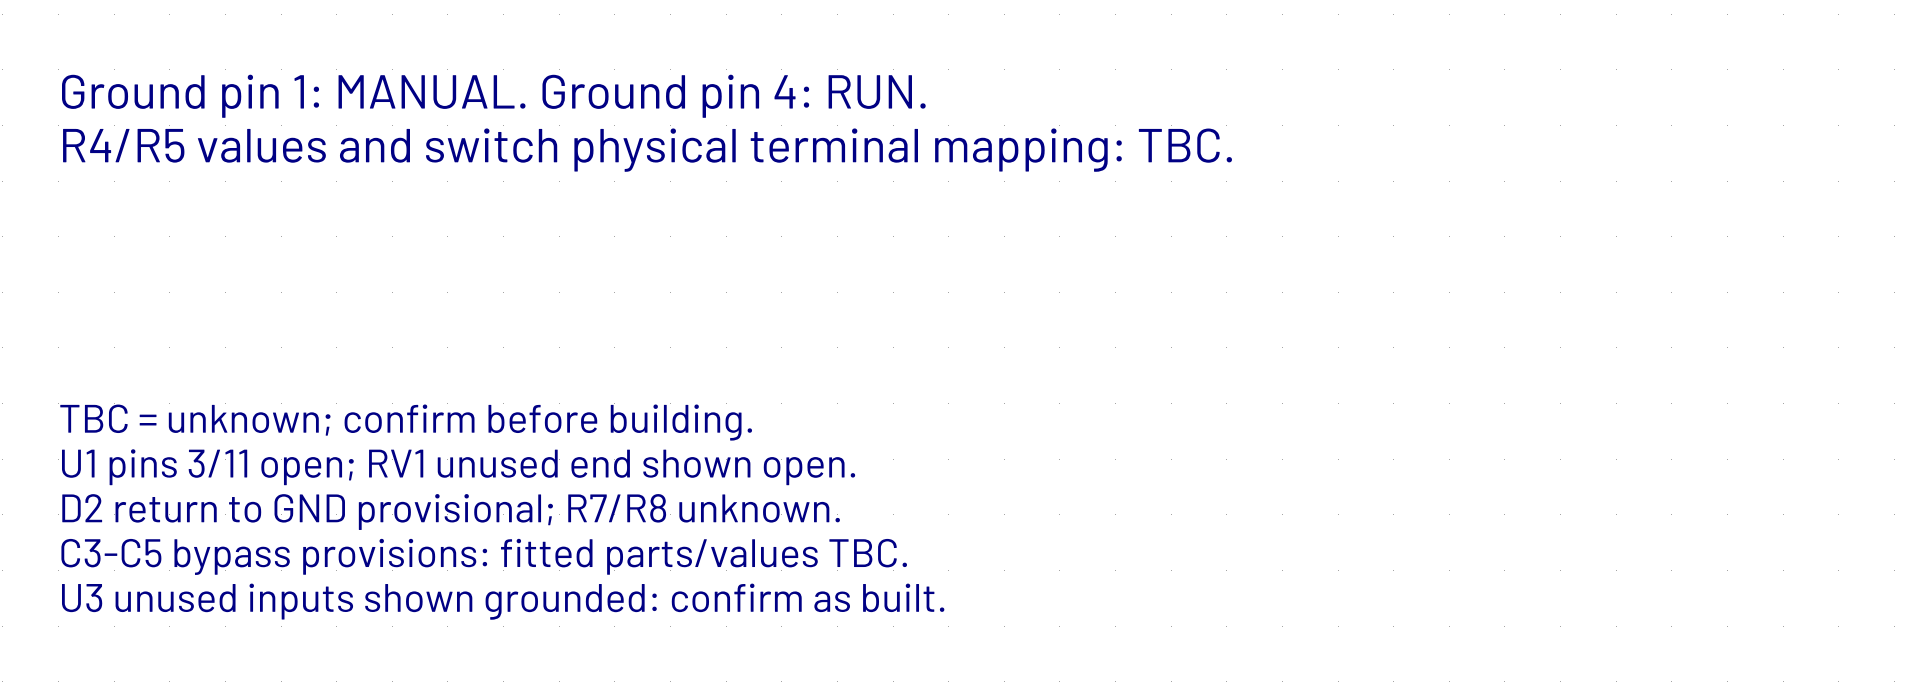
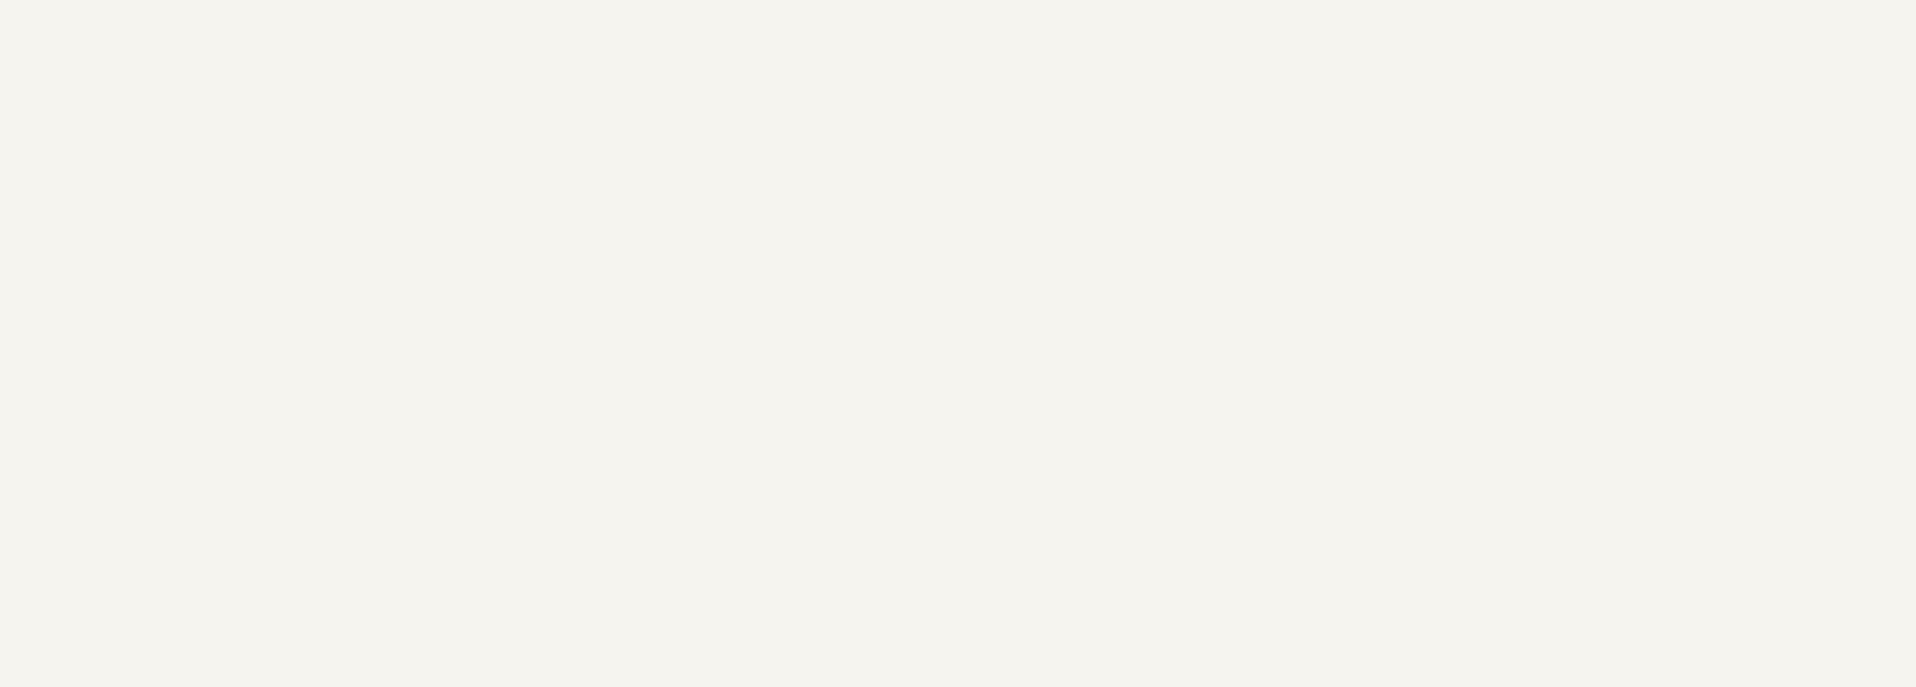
text: Ground pin 1: MANUAL. Ground pin 4: RUN. (493, 96) -> none
text: R4/R5 values and switch physical terminal mapping: TBC. (647, 150) -> none
text: TBC = unknown; confirm before building. (406, 422) -> none
text: U1 pins 3/11 open; RV1 unused end shown open. (458, 467) -> none
text: D2 return to GND provisional; R7/R8 unknown. (451, 512) -> none
text: C3-C5 bypass provisions: fitted parts/values TBC. (484, 556) -> none
text: U3 unused inputs shown grounded: confirm as built. (503, 601) -> none

